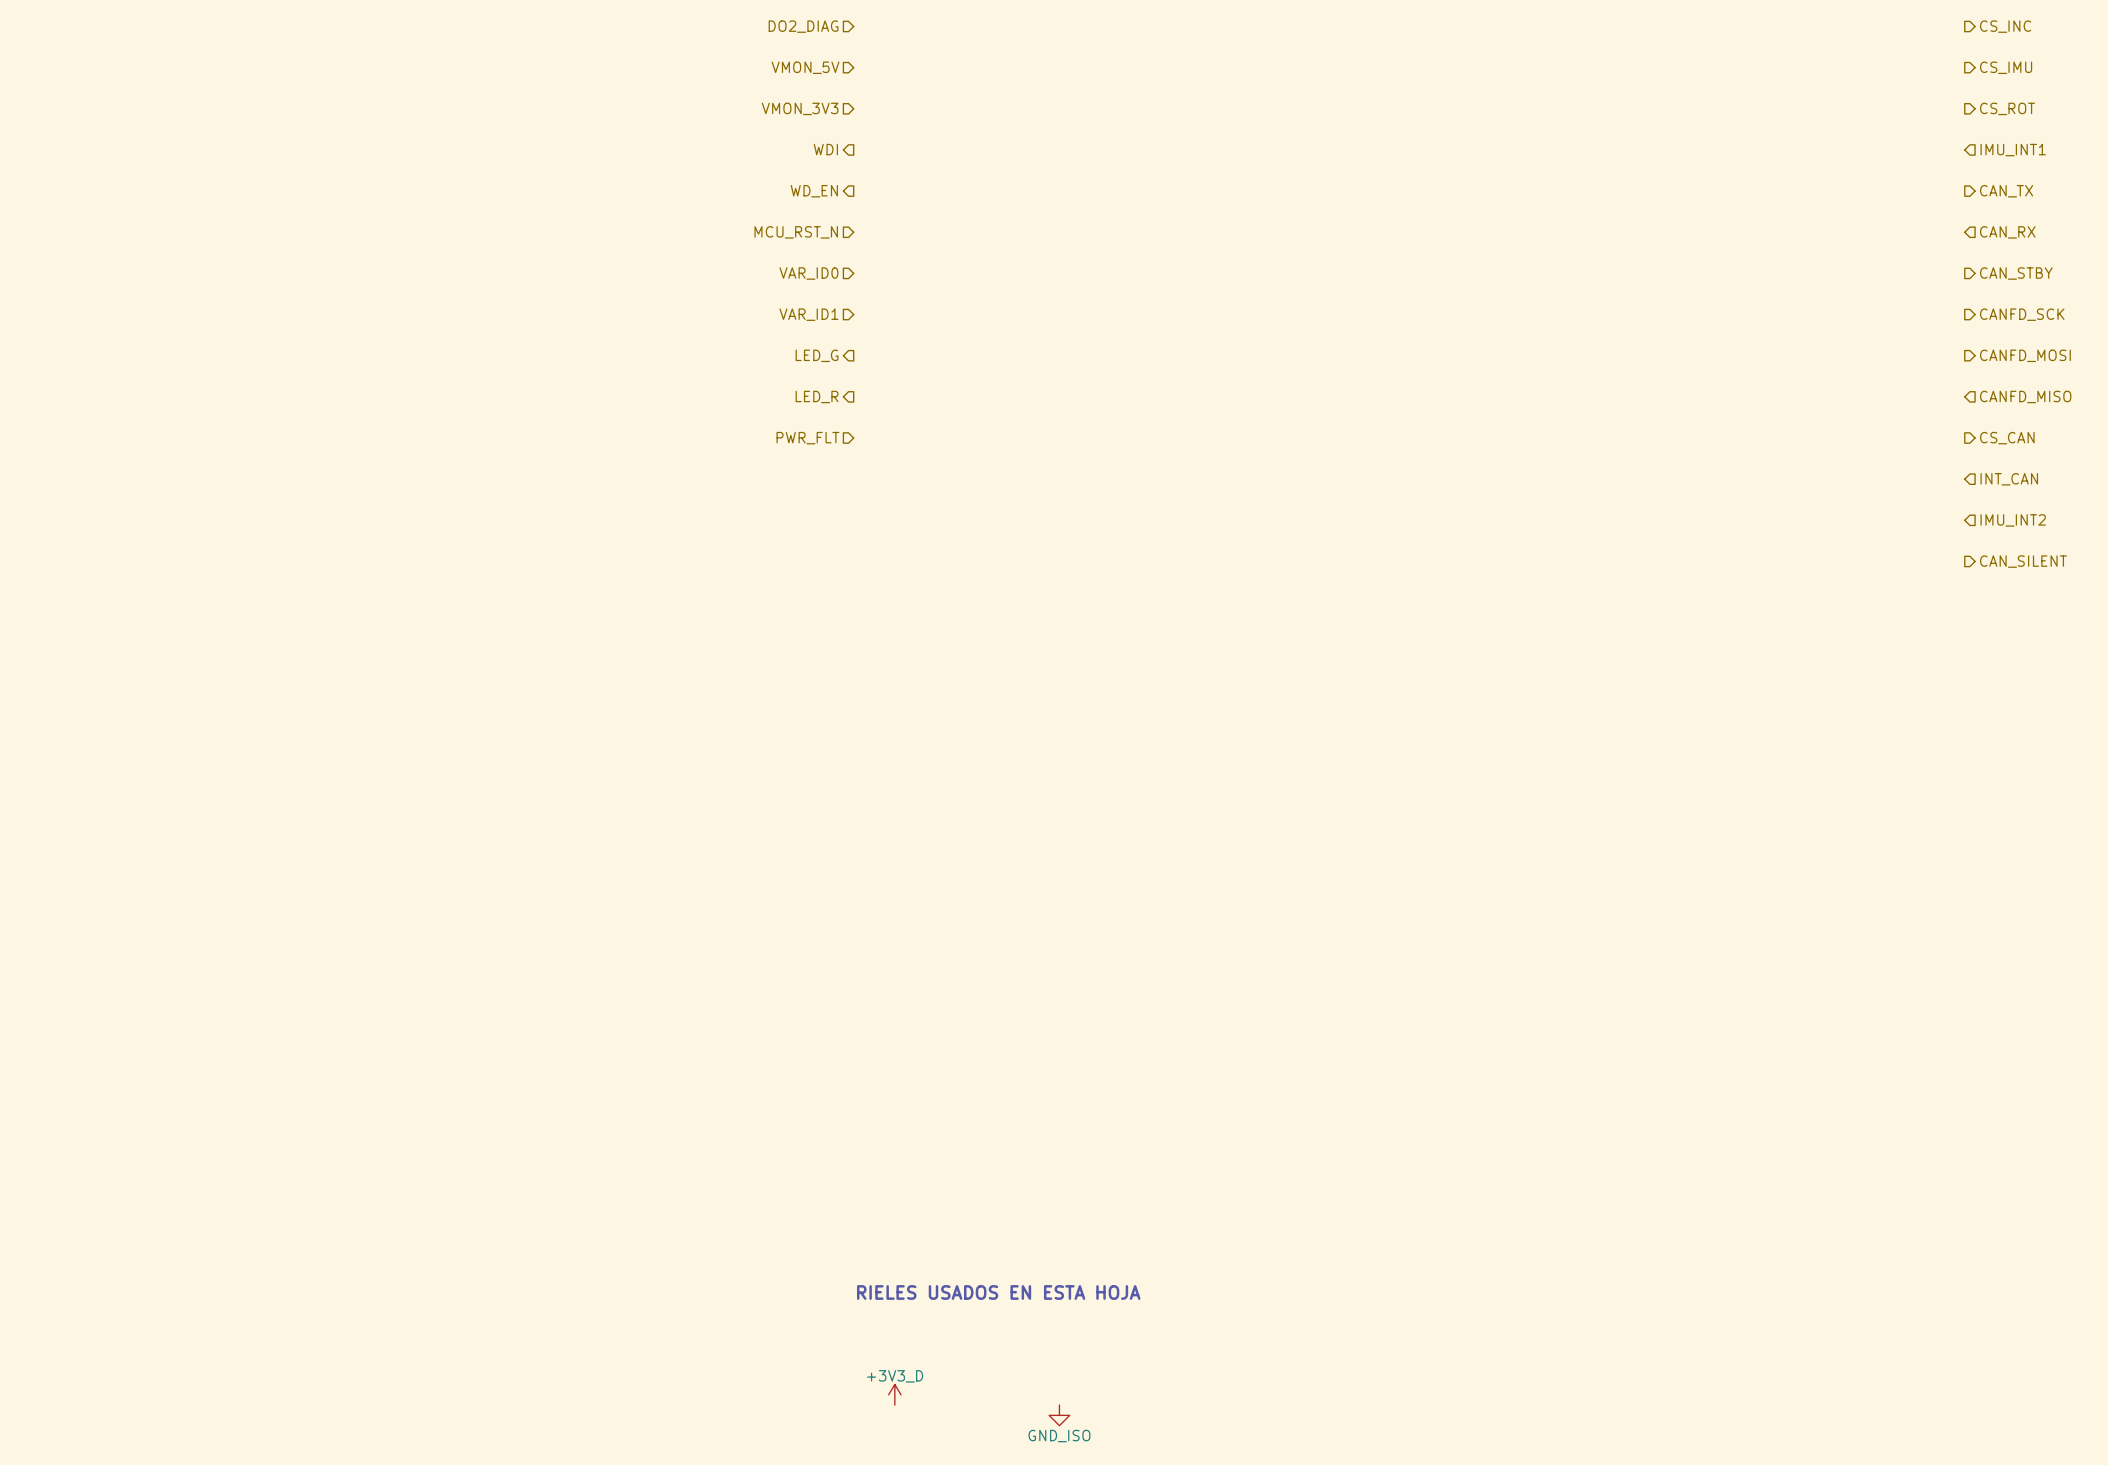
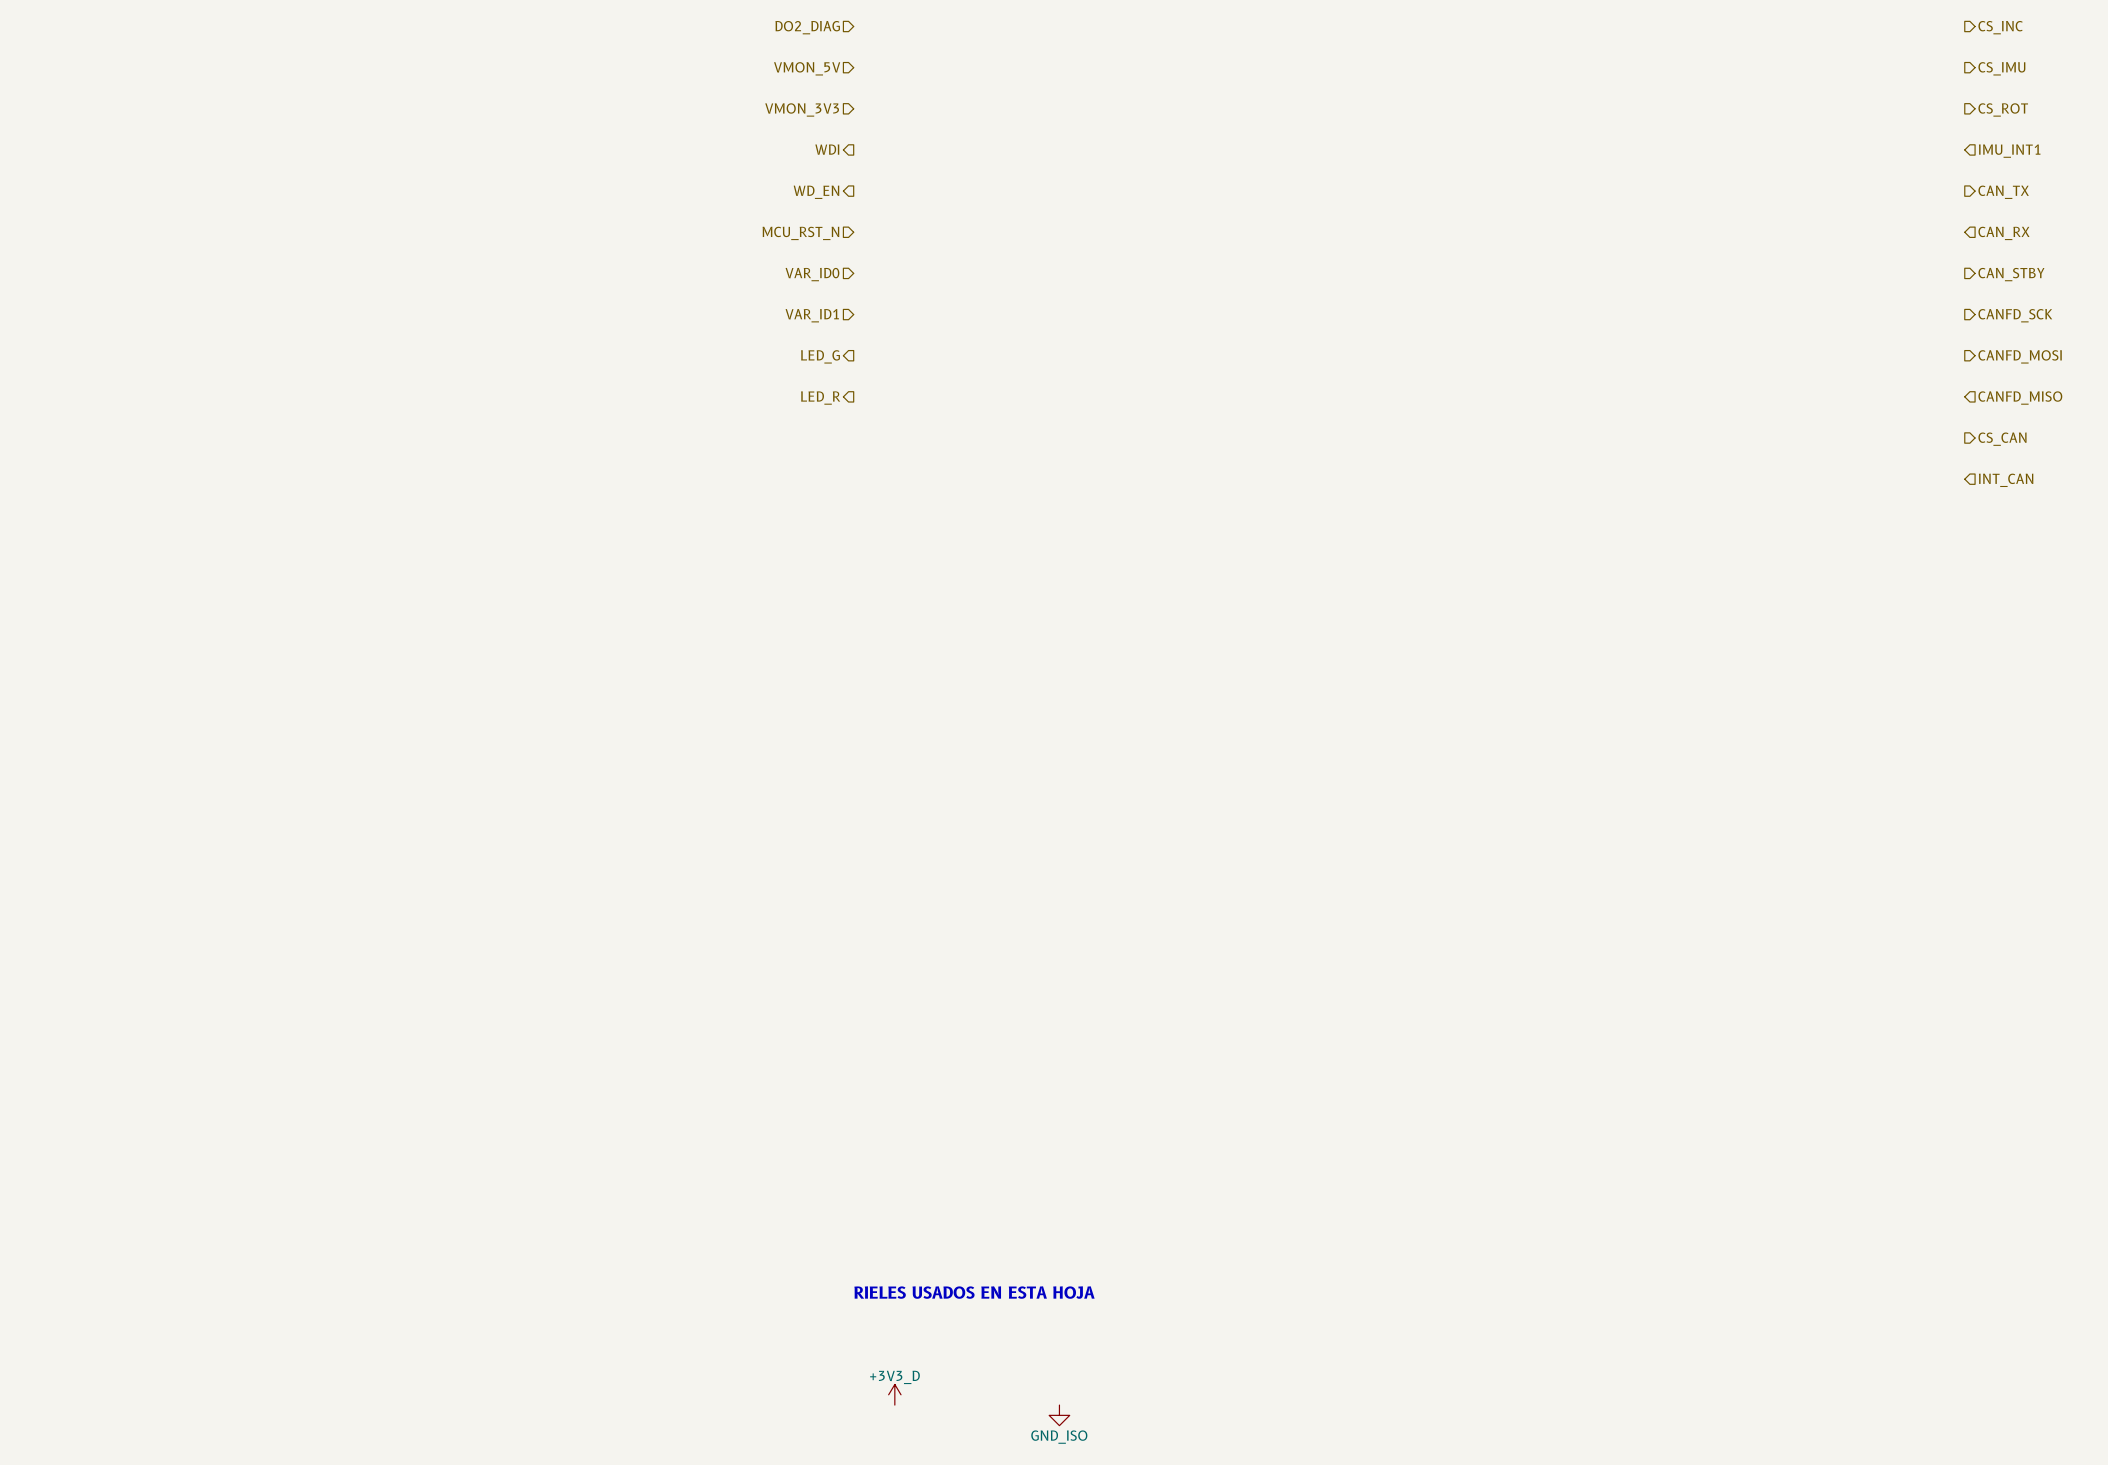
hierarchical label: PWR_FLT (807, 438) -> none
hierarchical label: IMU_INT2 (2013, 520) -> none
hierarchical label: CAN_SILENT (2023, 561) -> none

